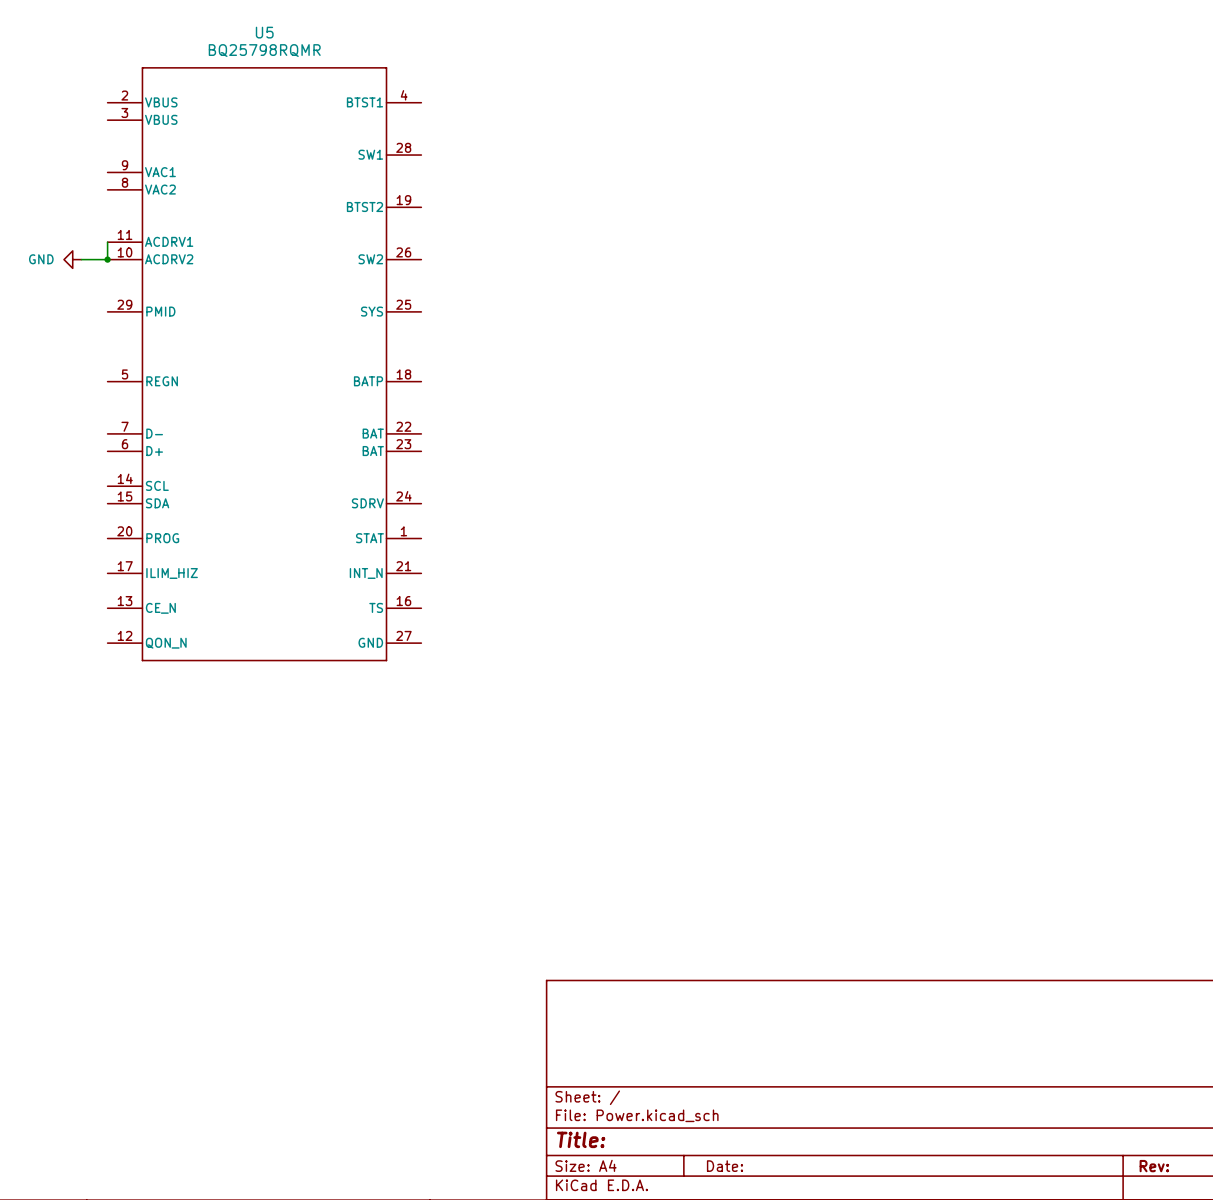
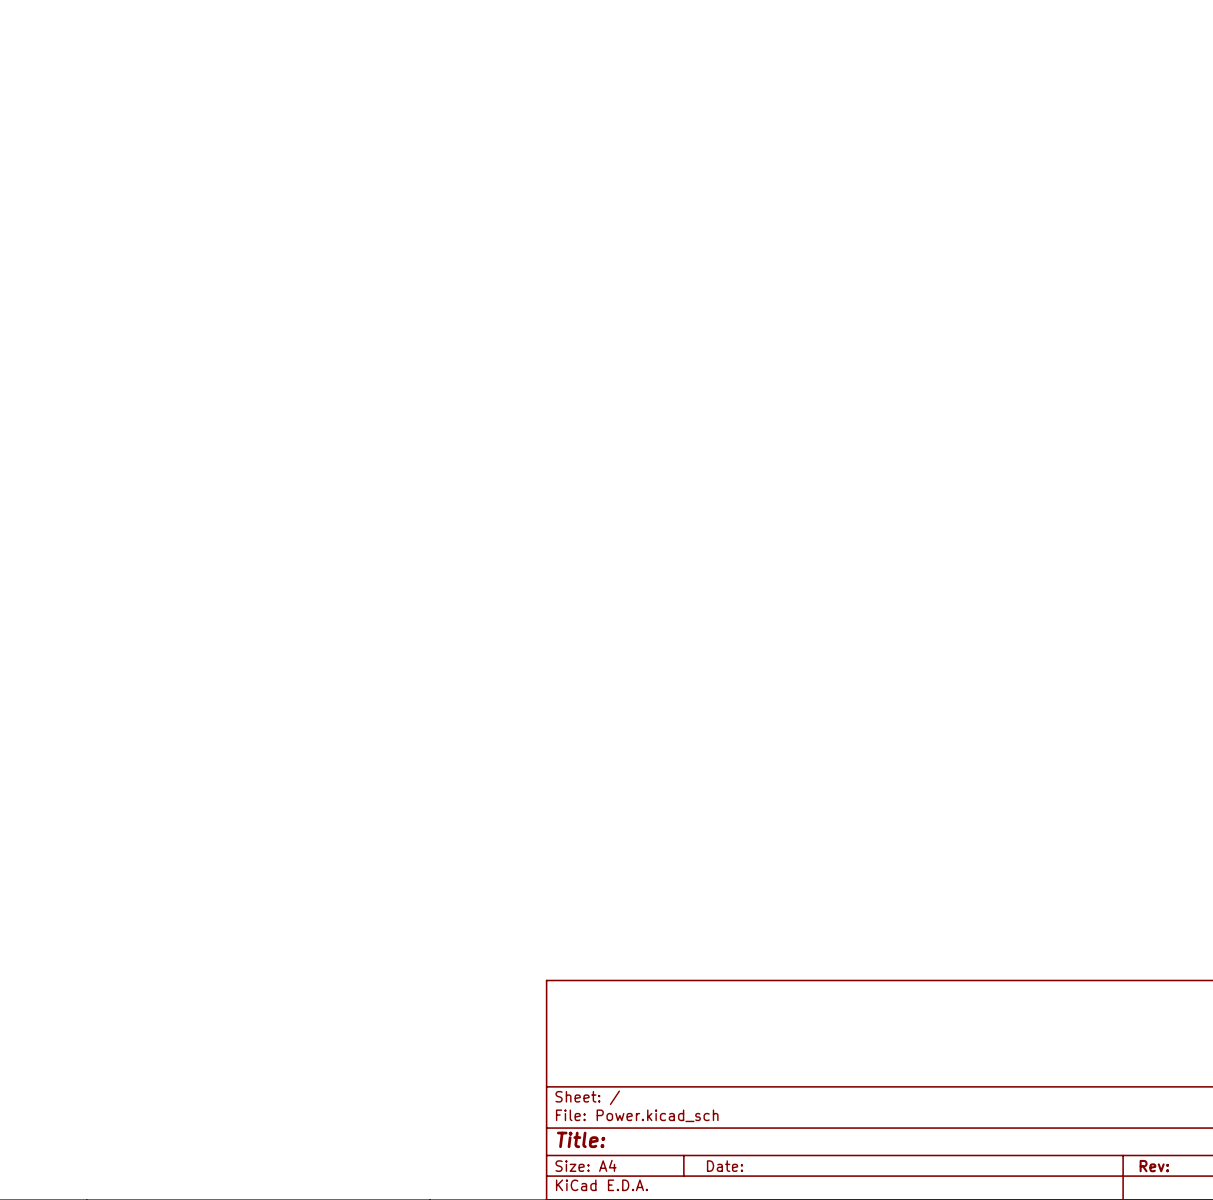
wire: (107, 242) (107, 259) (81, 259) -> none
power symbol: GND (72, 259) -> none
junction: (107, 259) -> none
U5: BQ25798RQMR (264, 364) -> none

